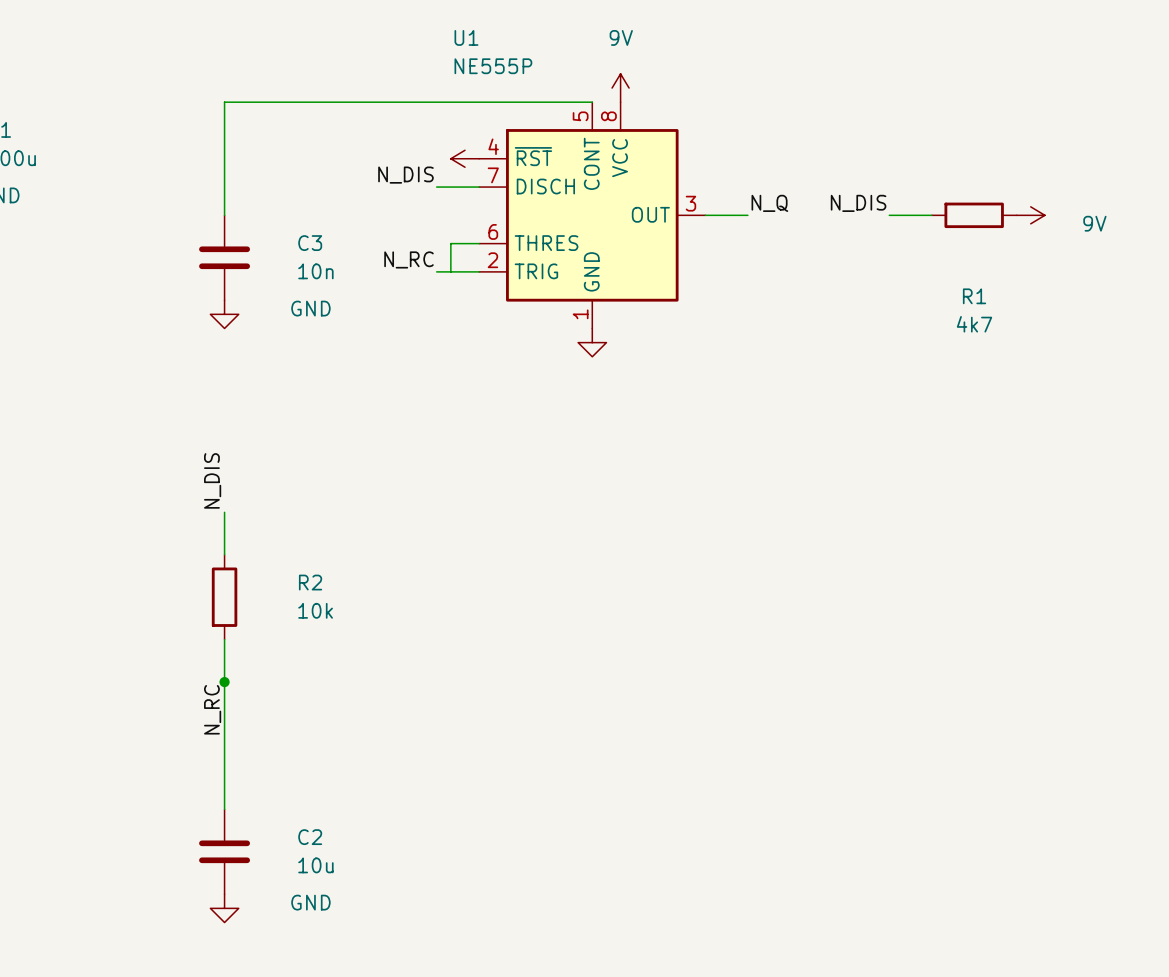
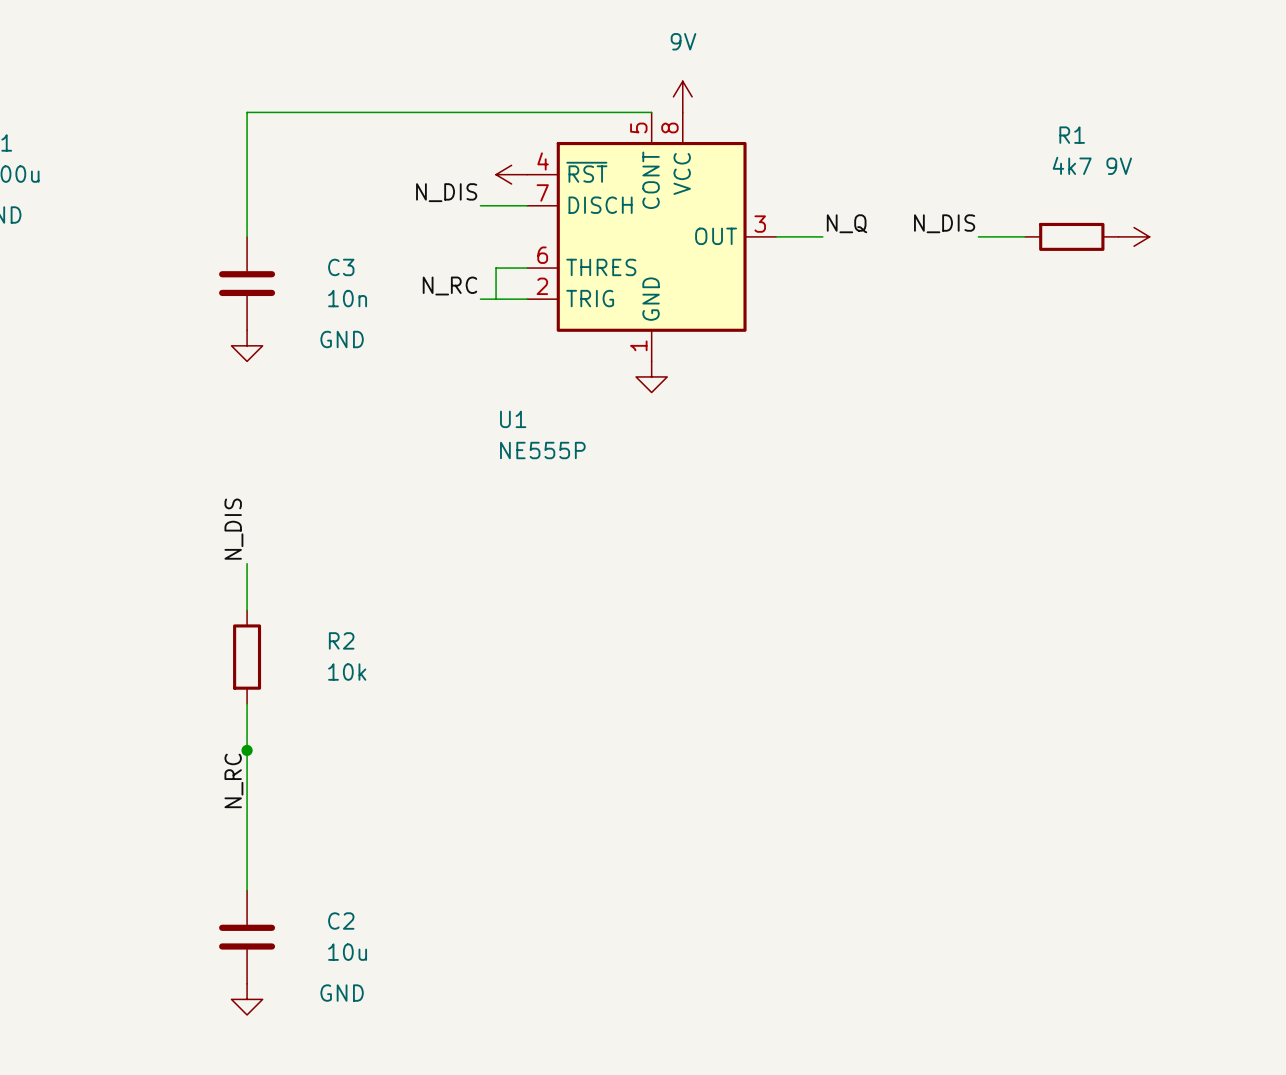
U1 name position: U1 (466, 37) -> U1 (513, 419)
U1 value position: NE555P (493, 66) -> NE555P (542, 450)
power symbol text position: 9V (1094, 223) -> 9V (1119, 166)
R1 name position: R1 (974, 296) -> R1 (1072, 135)
R1 value position: 4k7 (974, 324) -> 4k7 (1072, 165)

